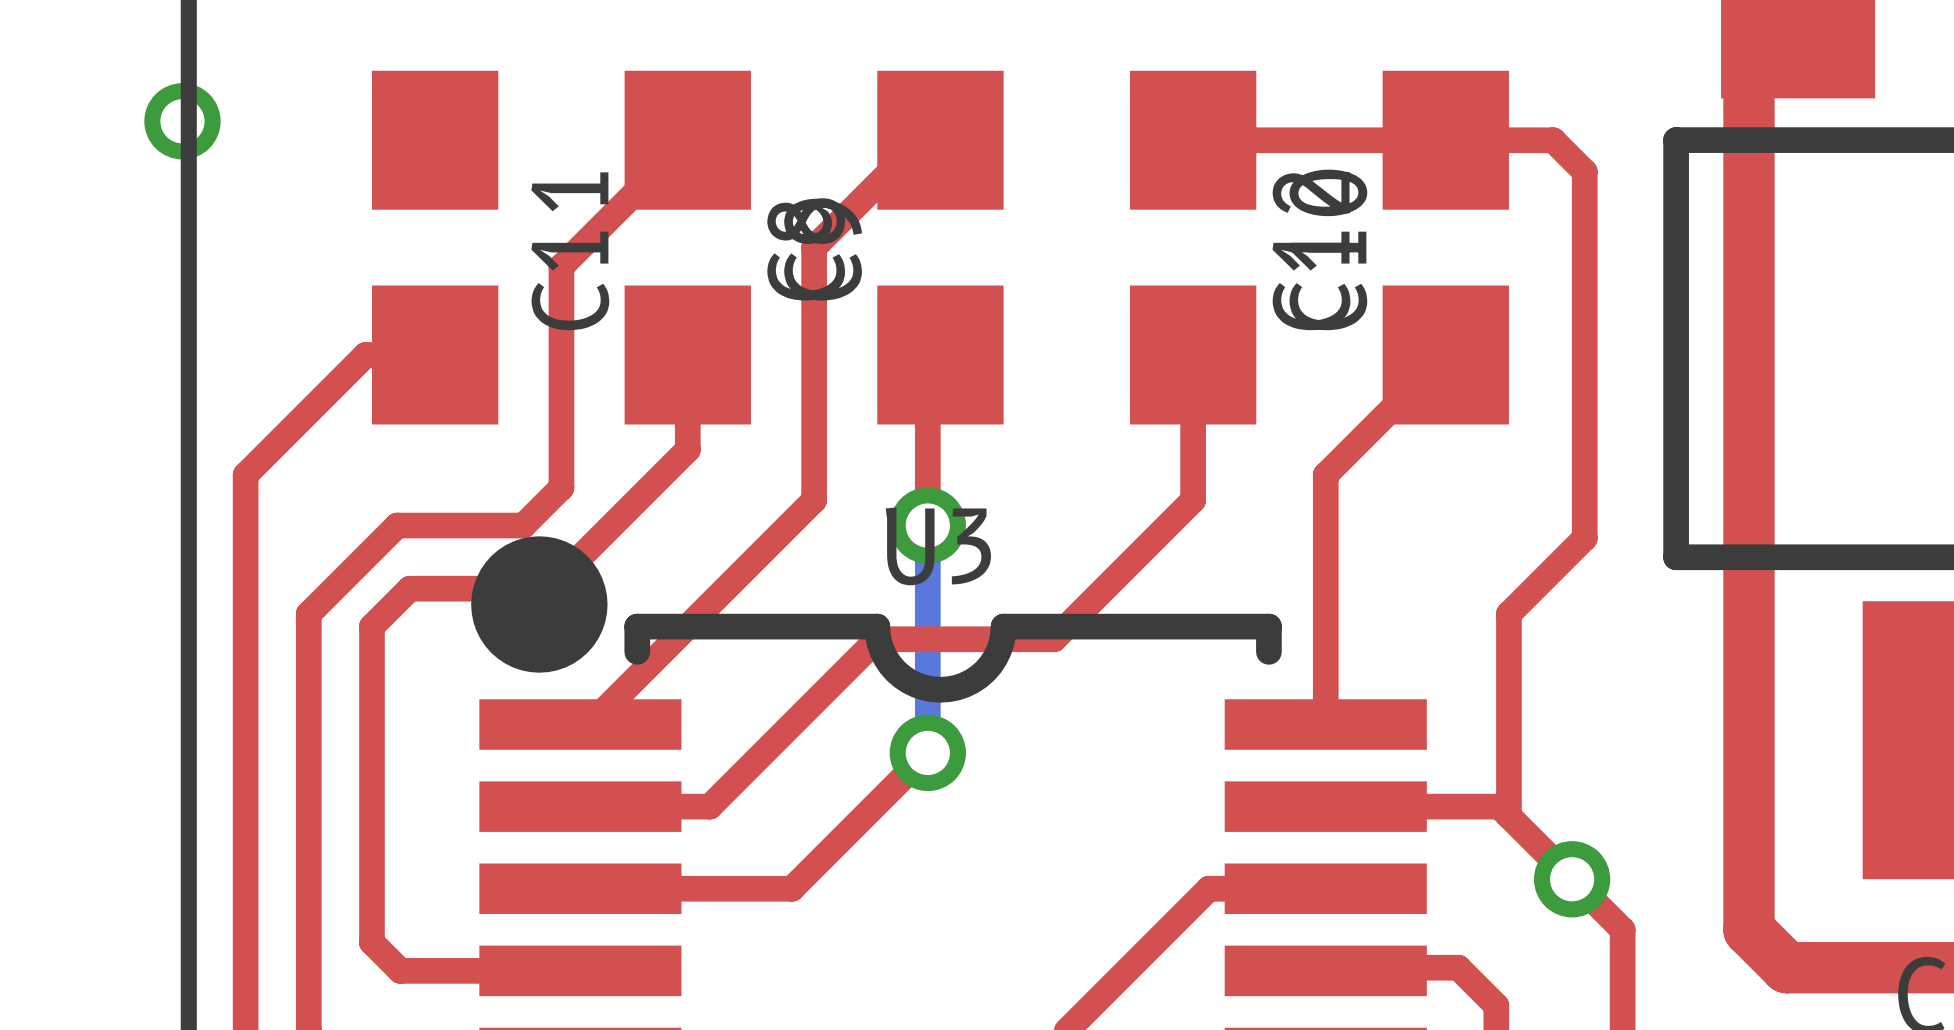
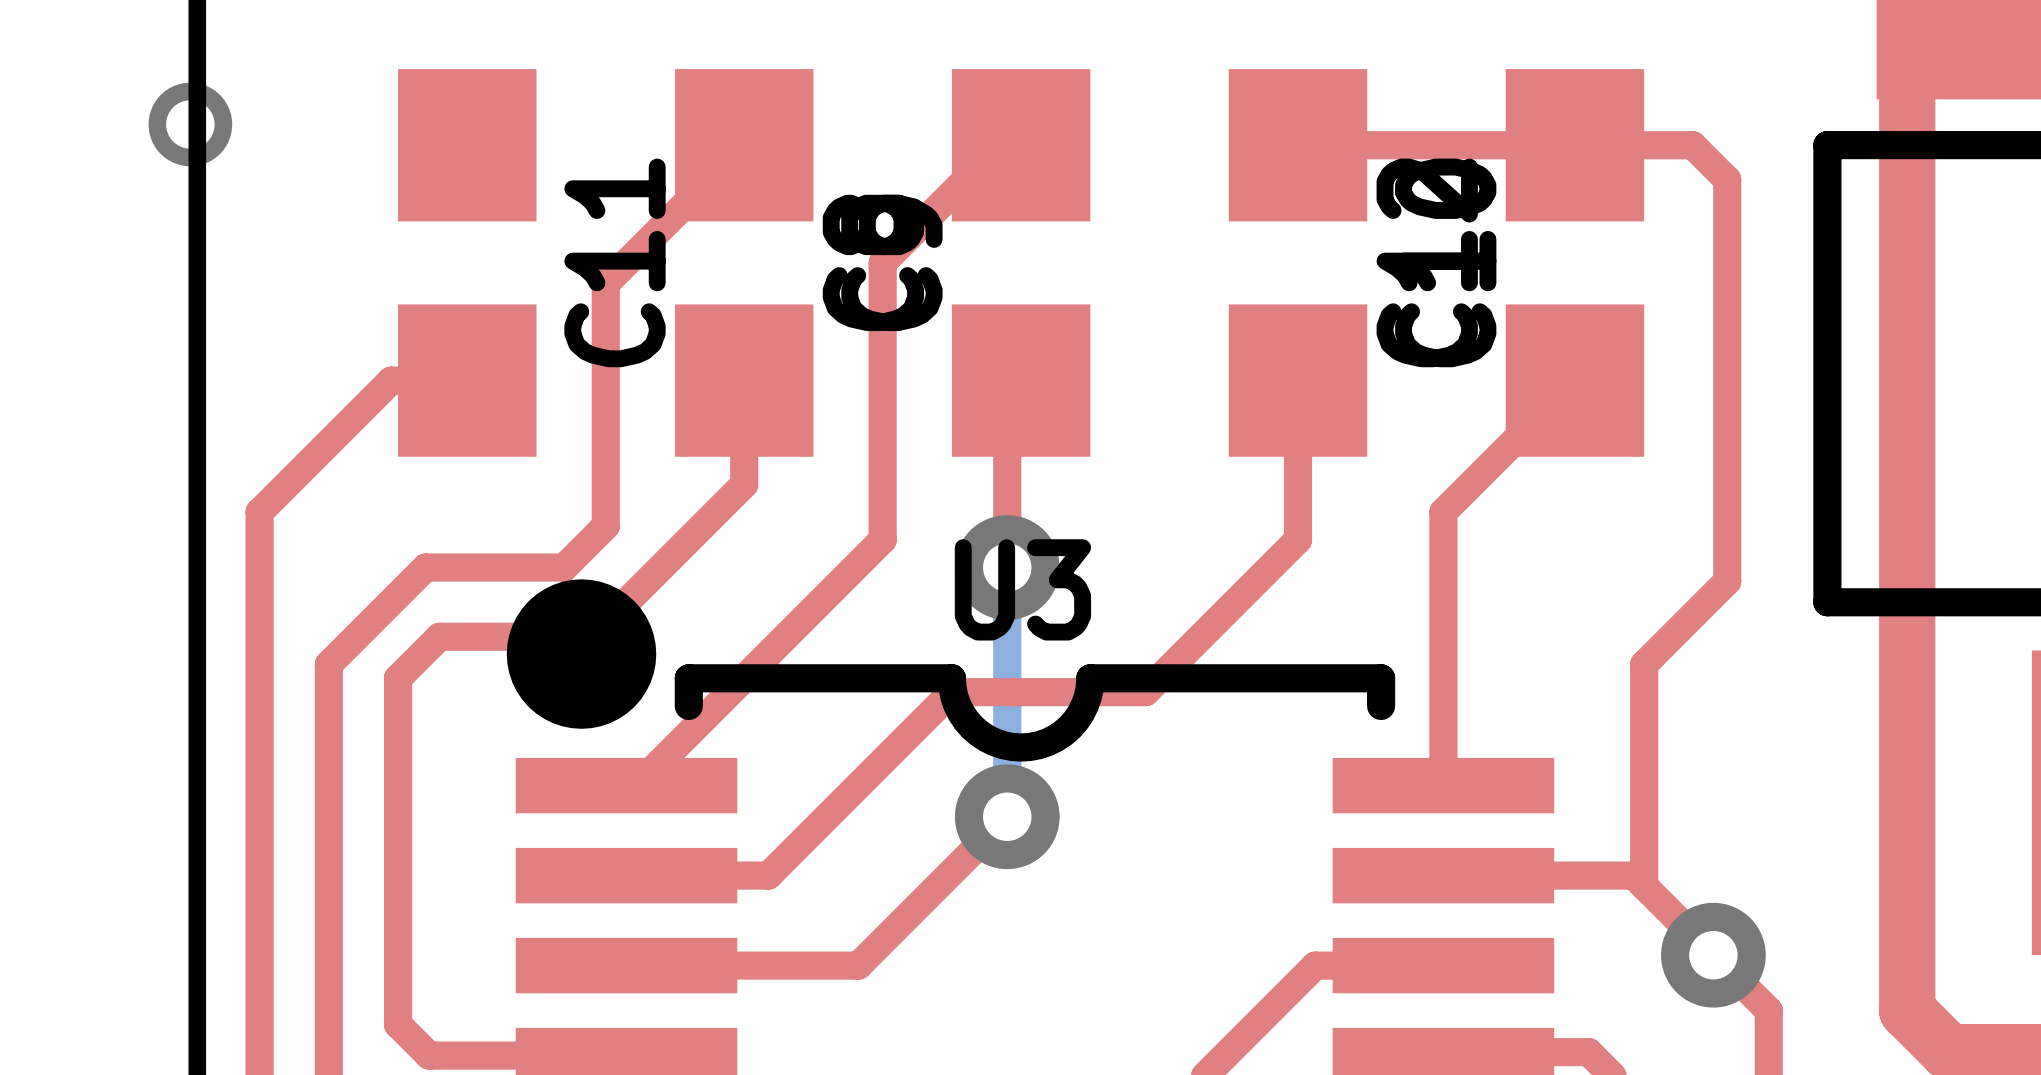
via size: [889, 487, 966, 564] -> [954, 515, 1060, 620]
via size: [889, 714, 966, 792] -> [954, 764, 1060, 870]
via size: [1533, 841, 1611, 918] -> [1661, 902, 1766, 1008]

